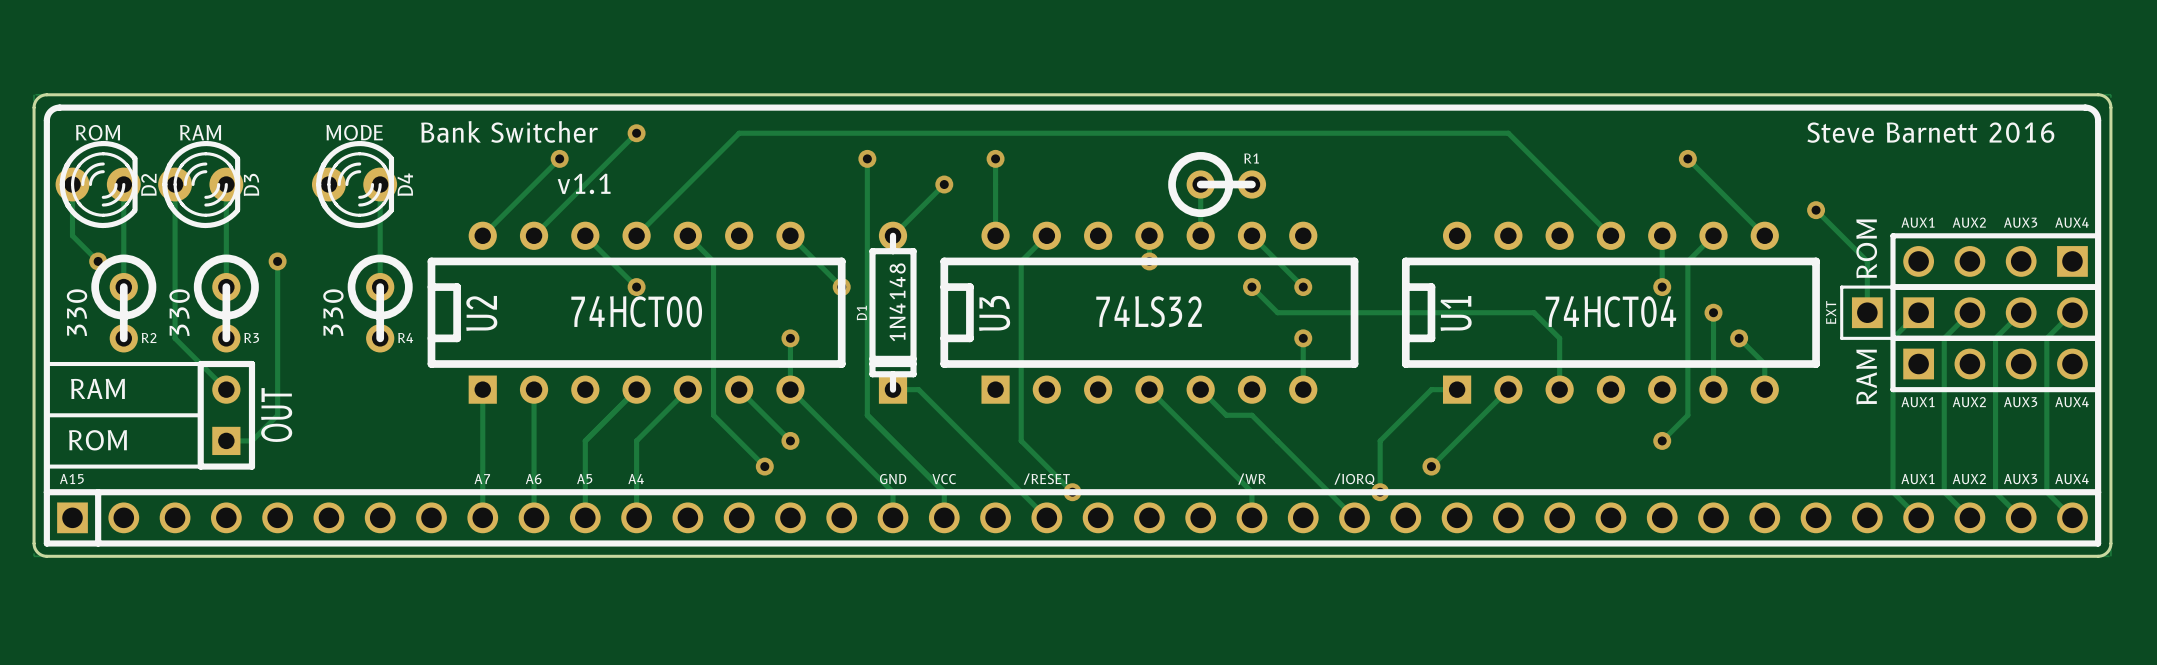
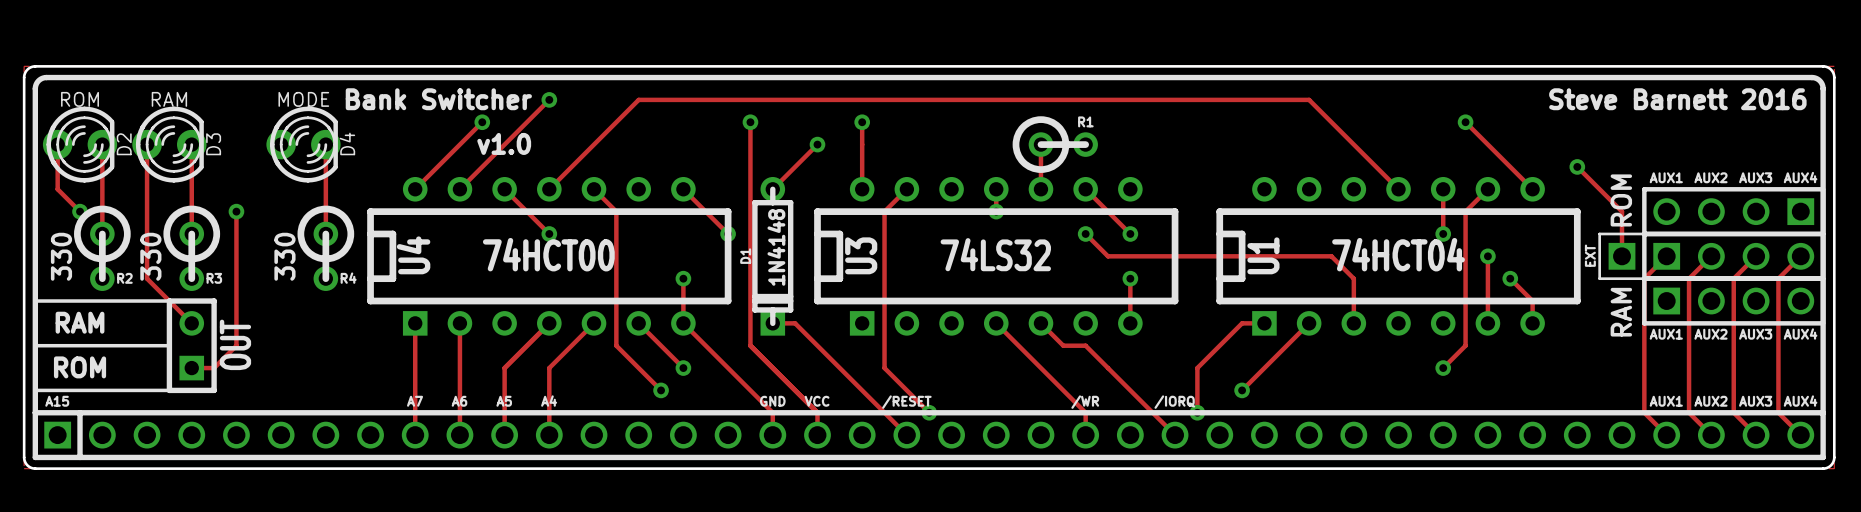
text: v1.1 (584, 183) -> v1.0 (504, 143)
U2 name: U2 (481, 313) -> U4 (413, 255)

